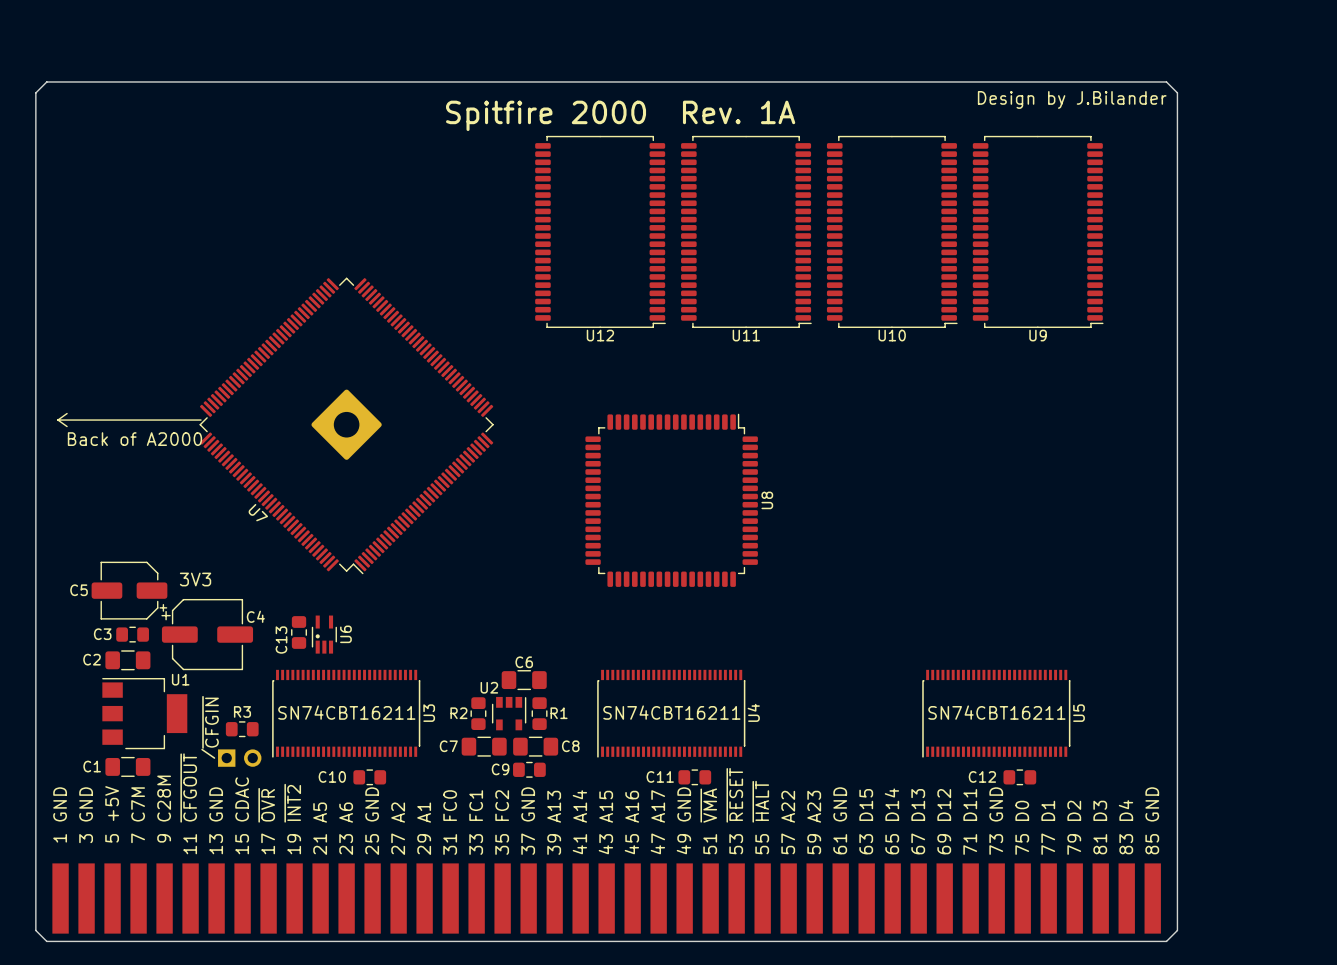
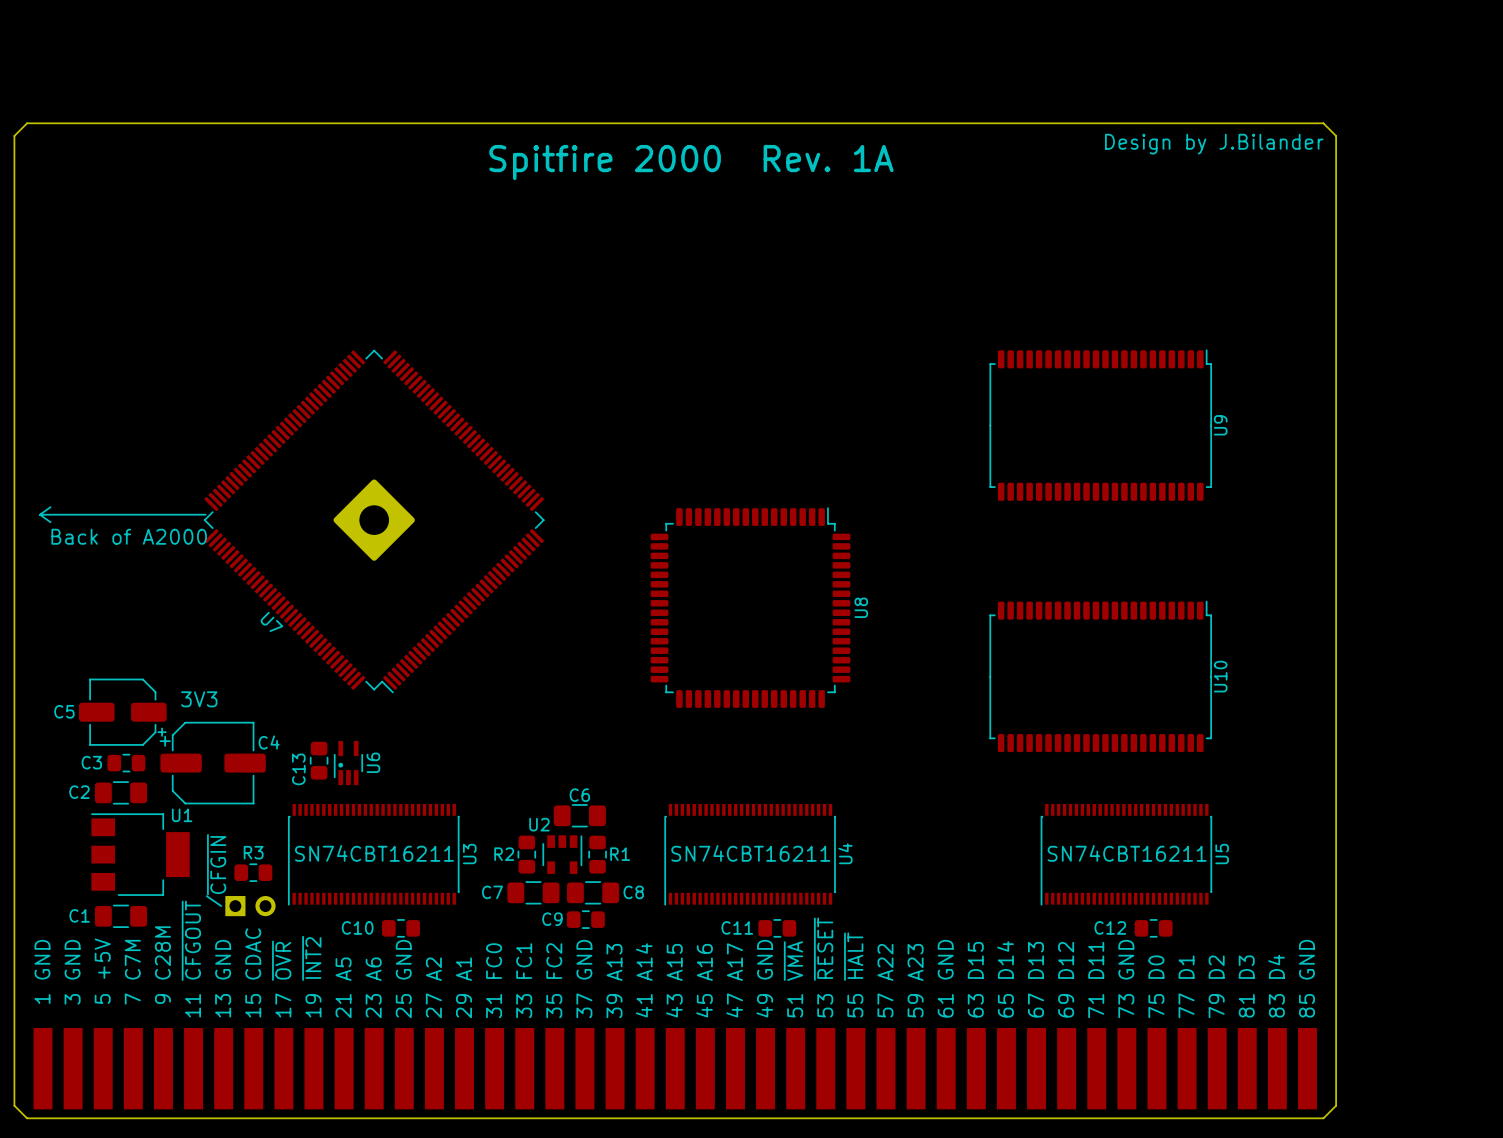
U12: (600, 231) -> none
U11: (746, 231) -> none
U10 rotation: 0° (892, 231) -> 90° counterclockwise (1100, 676)
U10 position: (892, 231) -> (1100, 676)
U9 rotation: 0° (1038, 231) -> 90° counterclockwise (1100, 425)
U9 position: (1038, 231) -> (1100, 425)

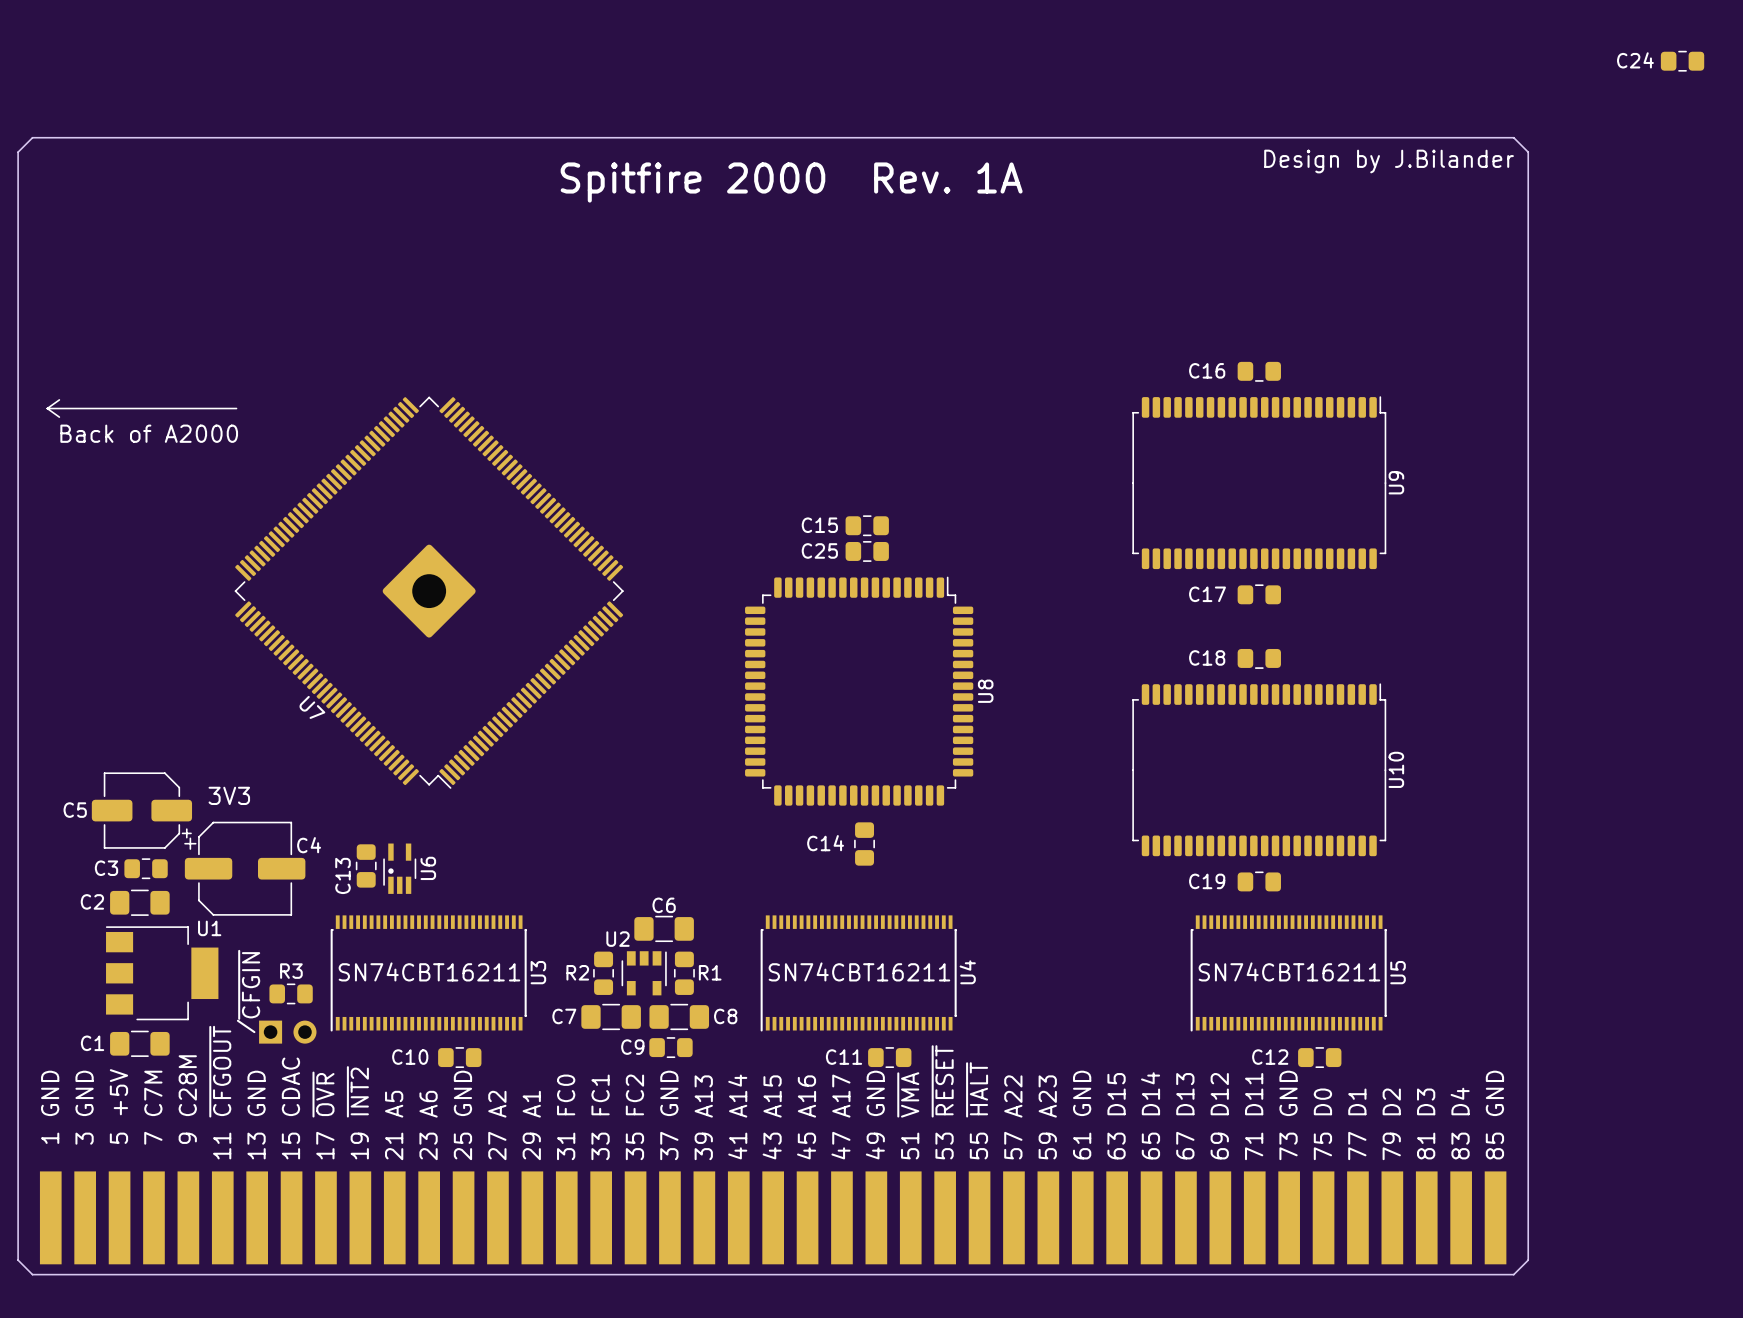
C24: none -> (1682, 61)
C16: none -> (1259, 371)
C15: none -> (867, 525)
C25: none -> (867, 551)
line: (50, 507) (40, 514) -> (59, 399) (47, 408)
line: (40, 514) (205, 514) -> (47, 408) (236, 408)
line: (40, 514) (50, 522) -> (47, 408) (59, 417)
C17: none -> (1259, 594)
text position: Back of A2000 (129, 536) -> Back of A2000 (149, 433)
C18: none -> (1259, 658)
C14: none -> (864, 844)
C19: none -> (1259, 881)

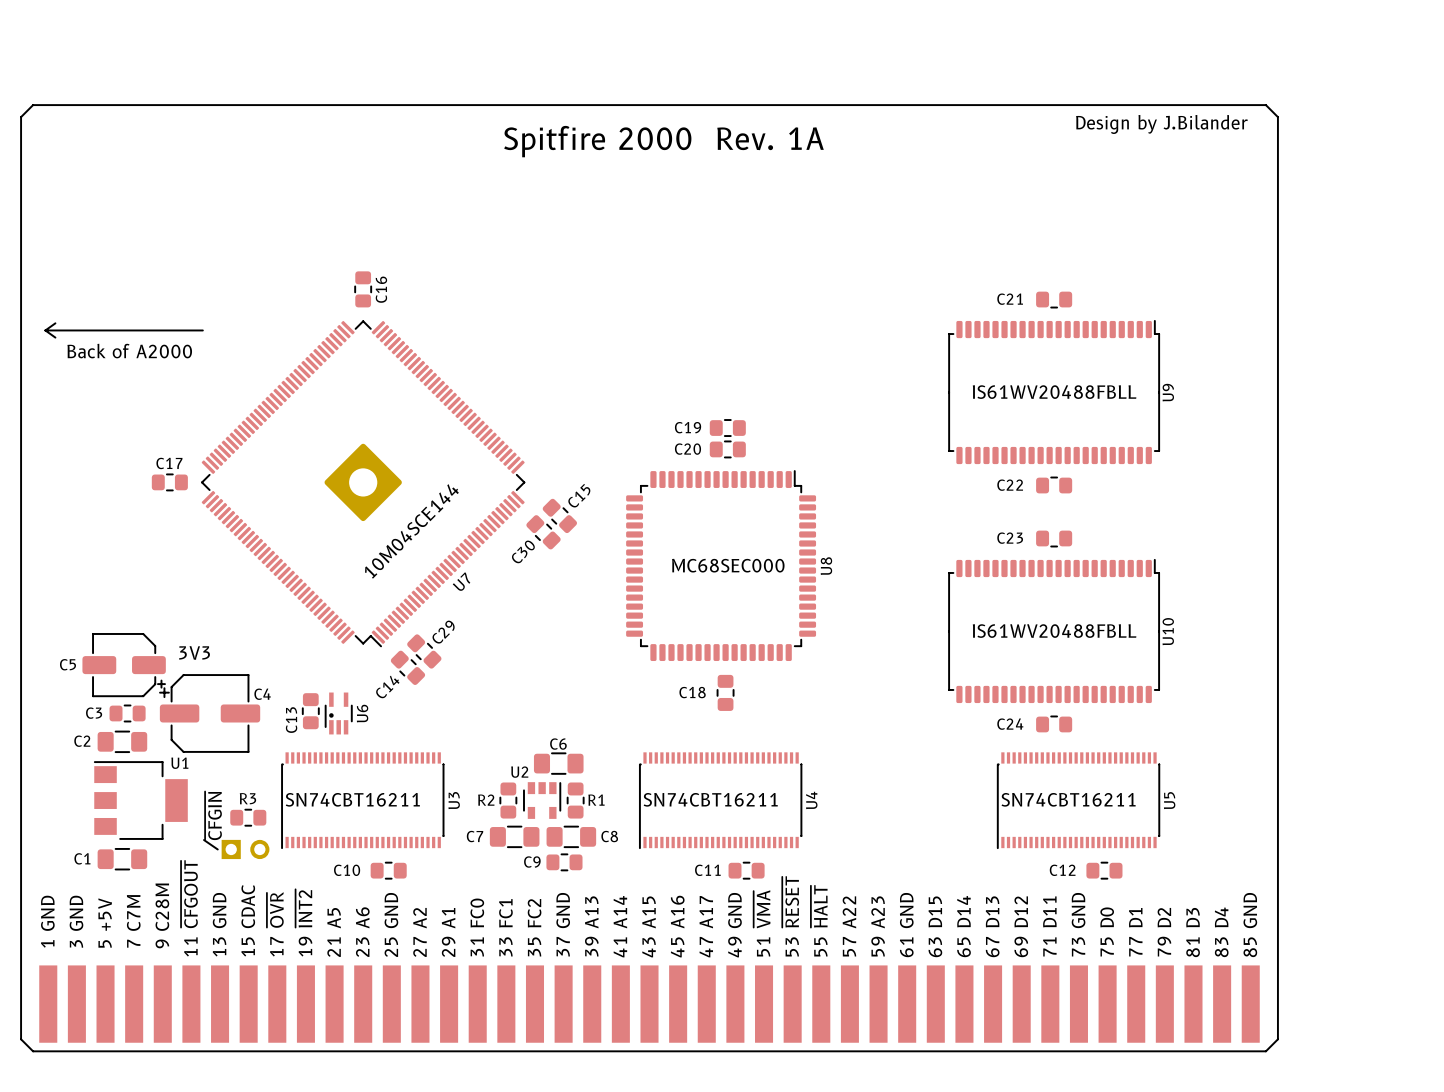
C24: (1682, 61) -> none
C16: none -> (363, 289)
C16 name: C16 (1207, 370) -> C21 (1010, 299)
text: none -> IS61WV20488FBLL (1054, 392)
C15 name: C15 (819, 525) -> C19 (688, 427)
C25 name: C25 (819, 550) -> C20 (687, 449)
C17: none -> (169, 482)
C17 name: C17 (1207, 594) -> C22 (1010, 485)
C15: none -> (559, 515)
text: none -> 10M04SCE144 (411, 531)
C30: none -> (543, 532)
C18 name: C18 (1207, 657) -> C23 (1010, 538)
text: none -> MC68SEC000 (728, 565)
U7 name rotation: 0° (312, 707) -> 90° counterclockwise (461, 581)
U7 name position: U7 (312, 707) -> U7 (461, 581)
text: none -> IS61WV20488FBLL (1054, 631)
C29: none -> (424, 651)
C14: none -> (407, 667)
C14 name: C14 (825, 843) -> C18 (692, 692)
C19 name: C19 (1207, 881) -> C24 (1010, 724)

